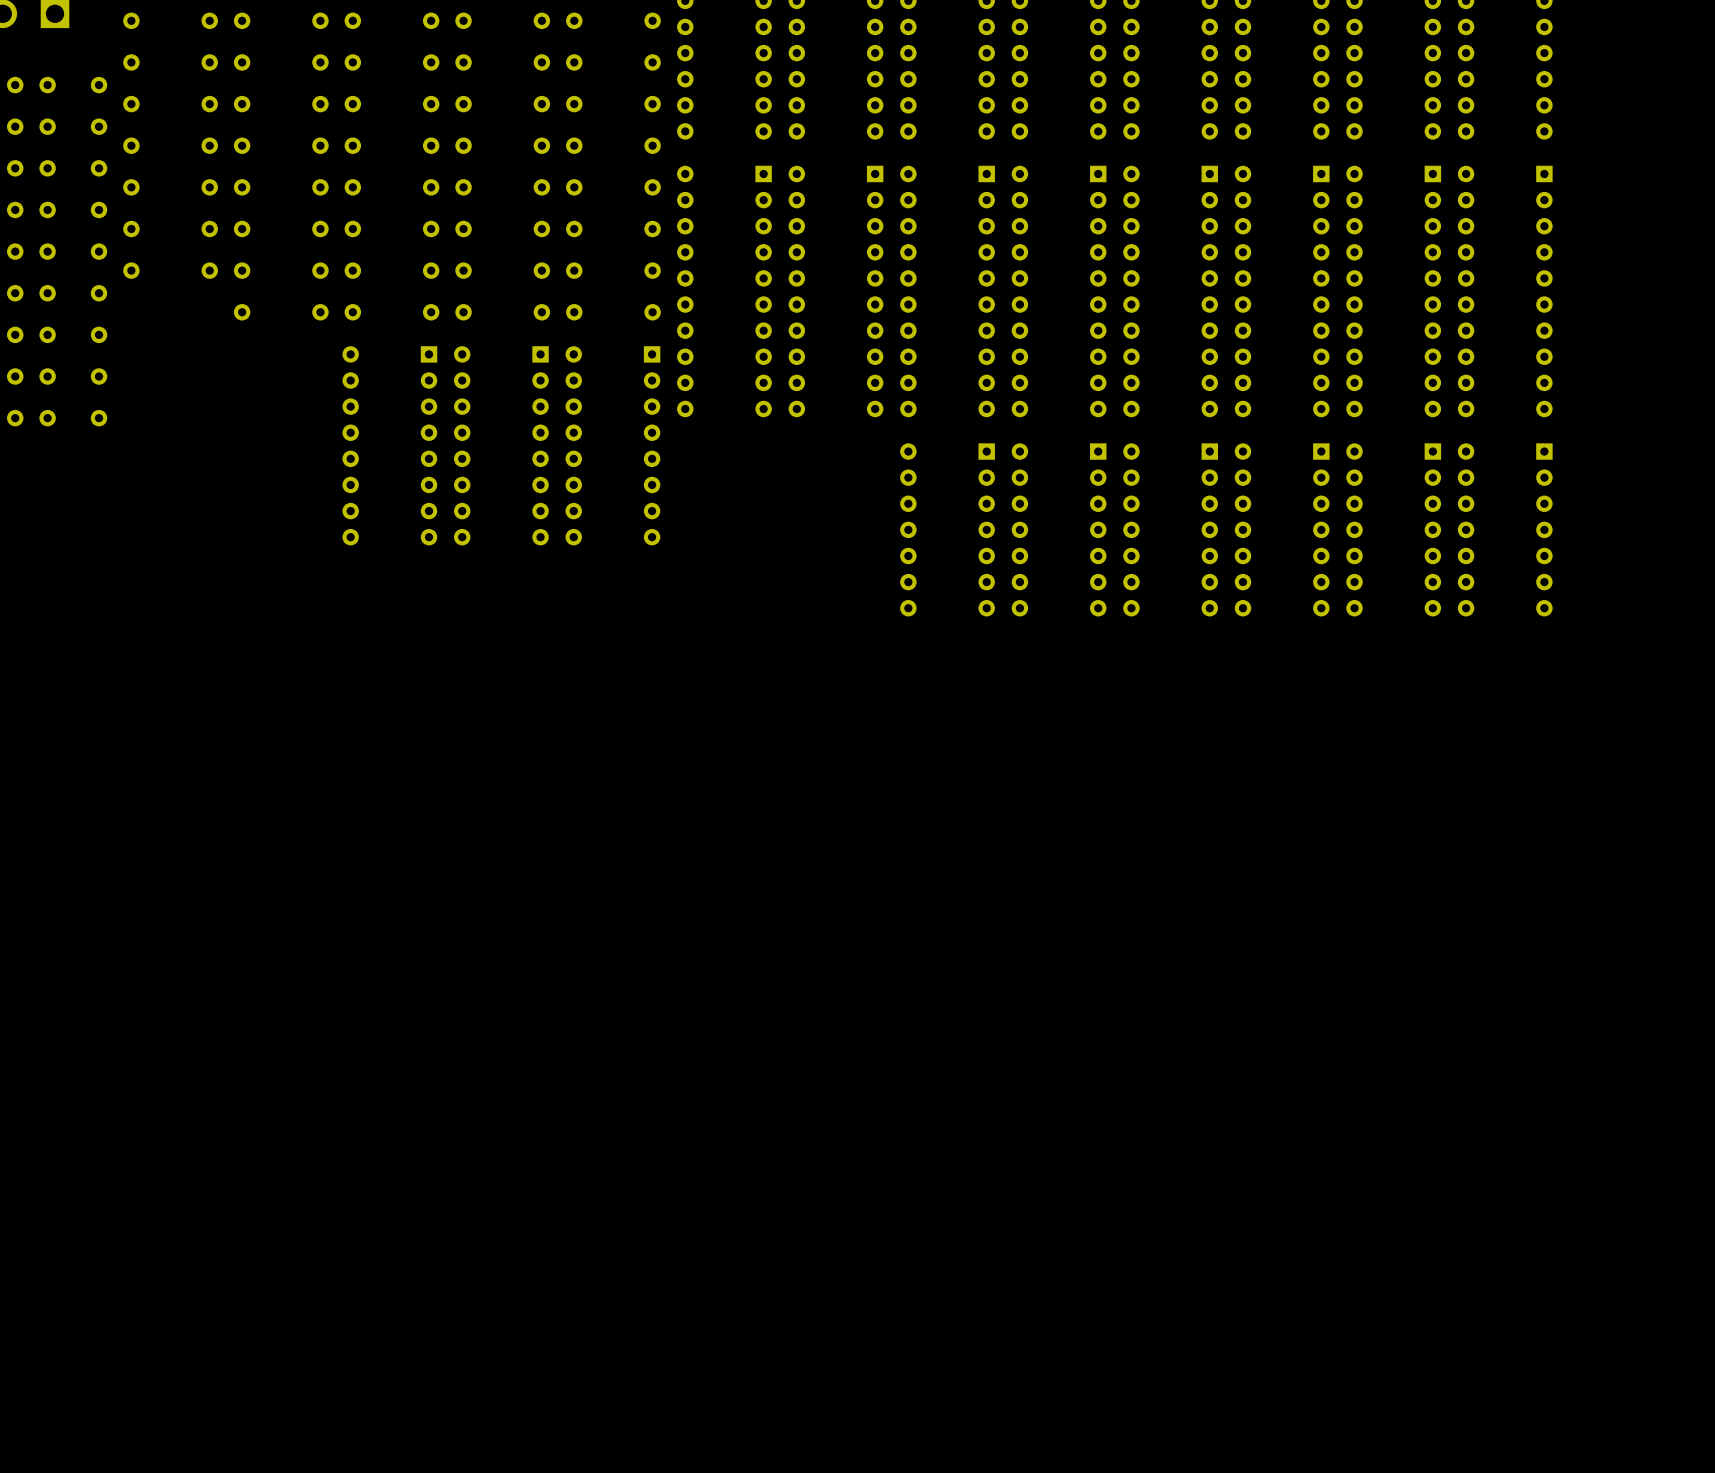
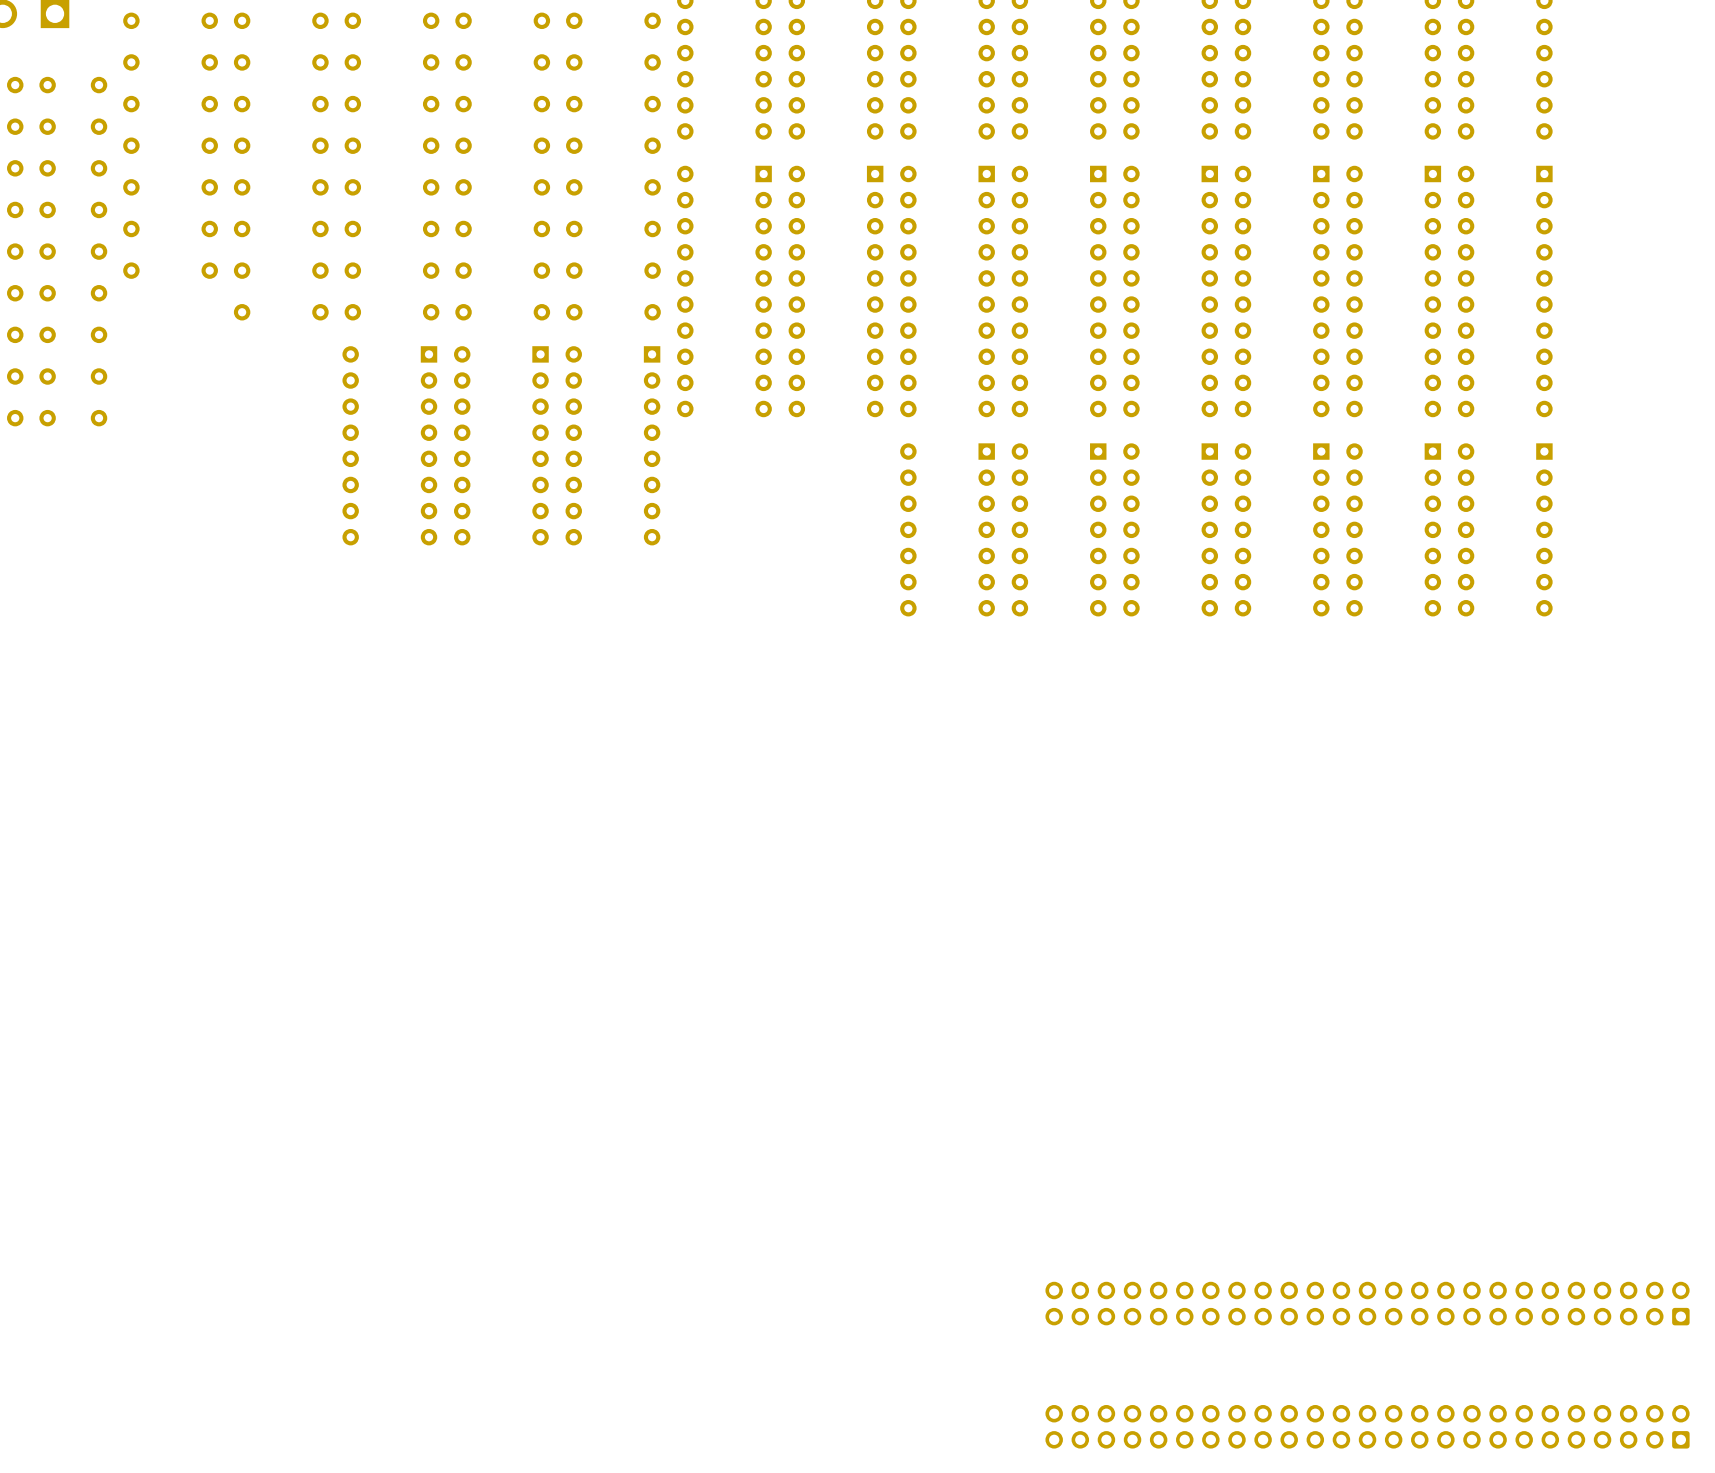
part: none -> (1367, 1303)
part: none -> (1367, 1426)

